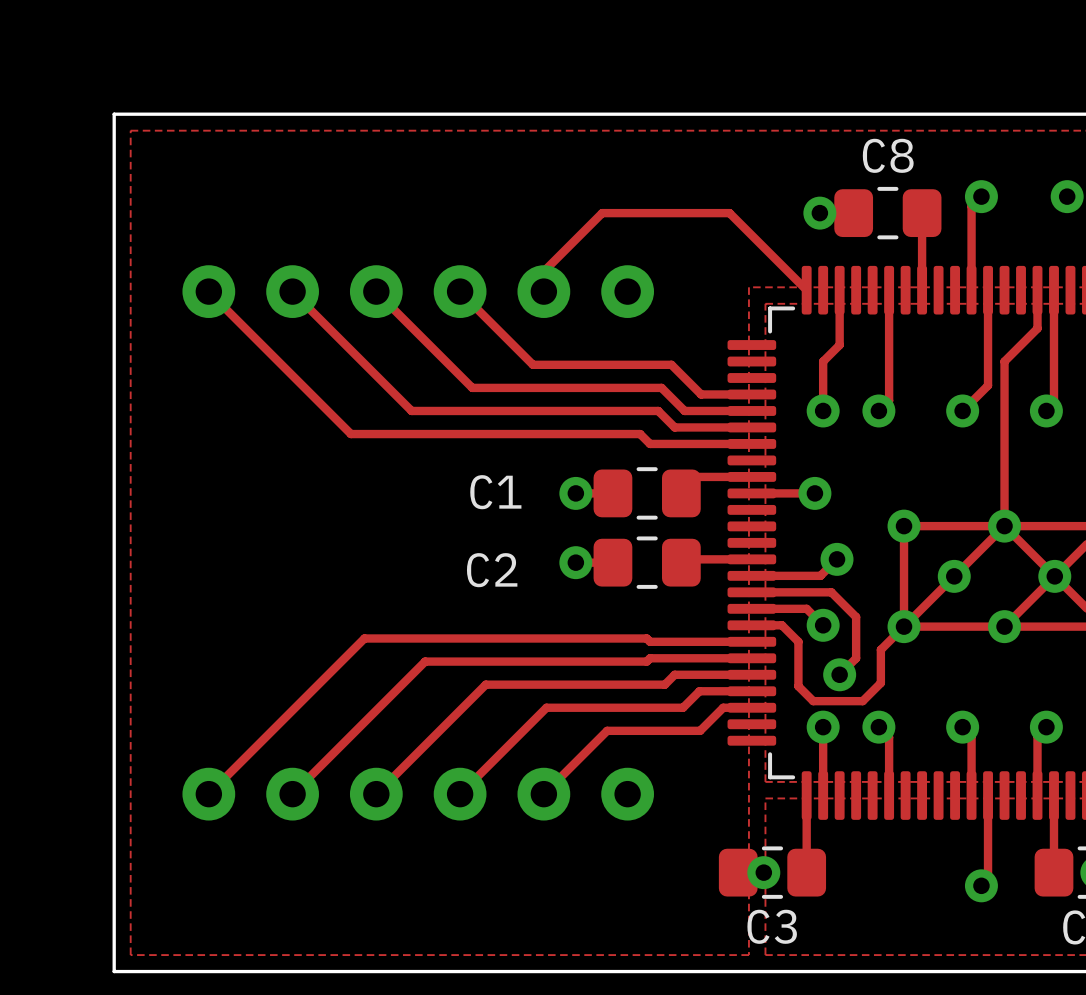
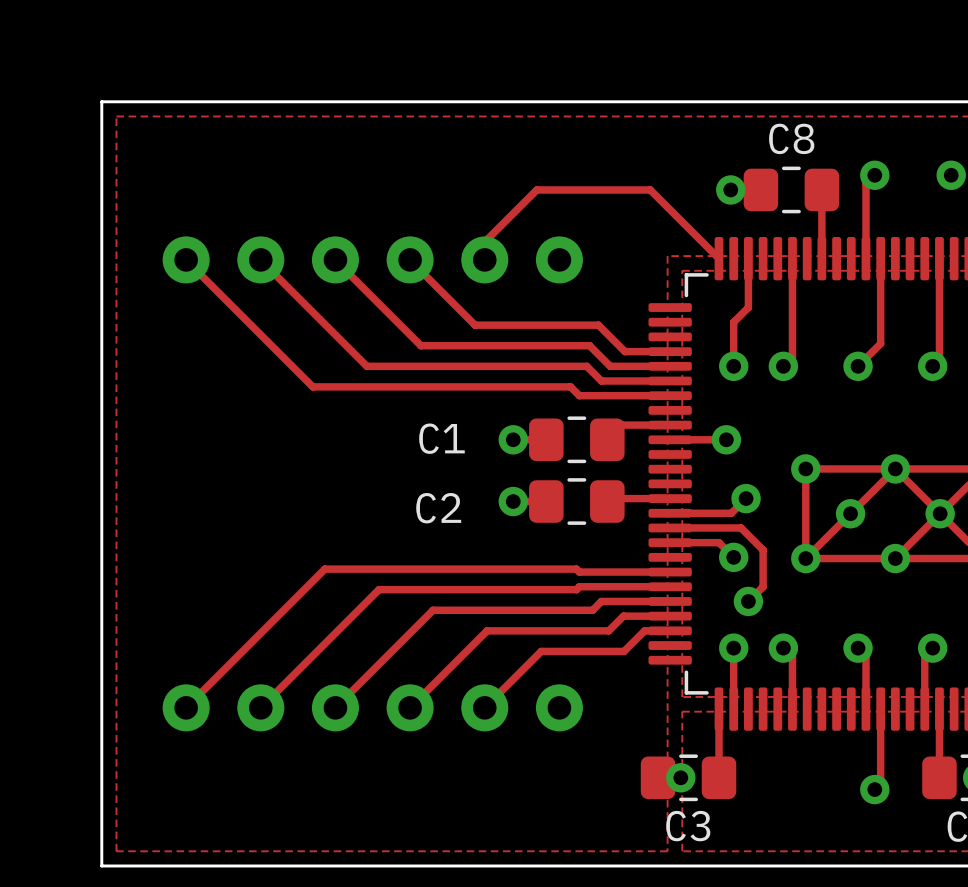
track: (1037, 290) (1037, 328) (1004, 361) (1004, 526) -> none
track: (751, 625) (781, 625) (798, 641) (798, 686) (813, 701) (862, 701) (880, 683) (880, 649) (904, 626) -> none

